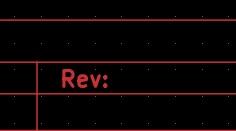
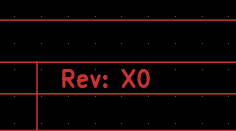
title block: Rev: (84, 78) -> Rev: X0 (106, 78)

